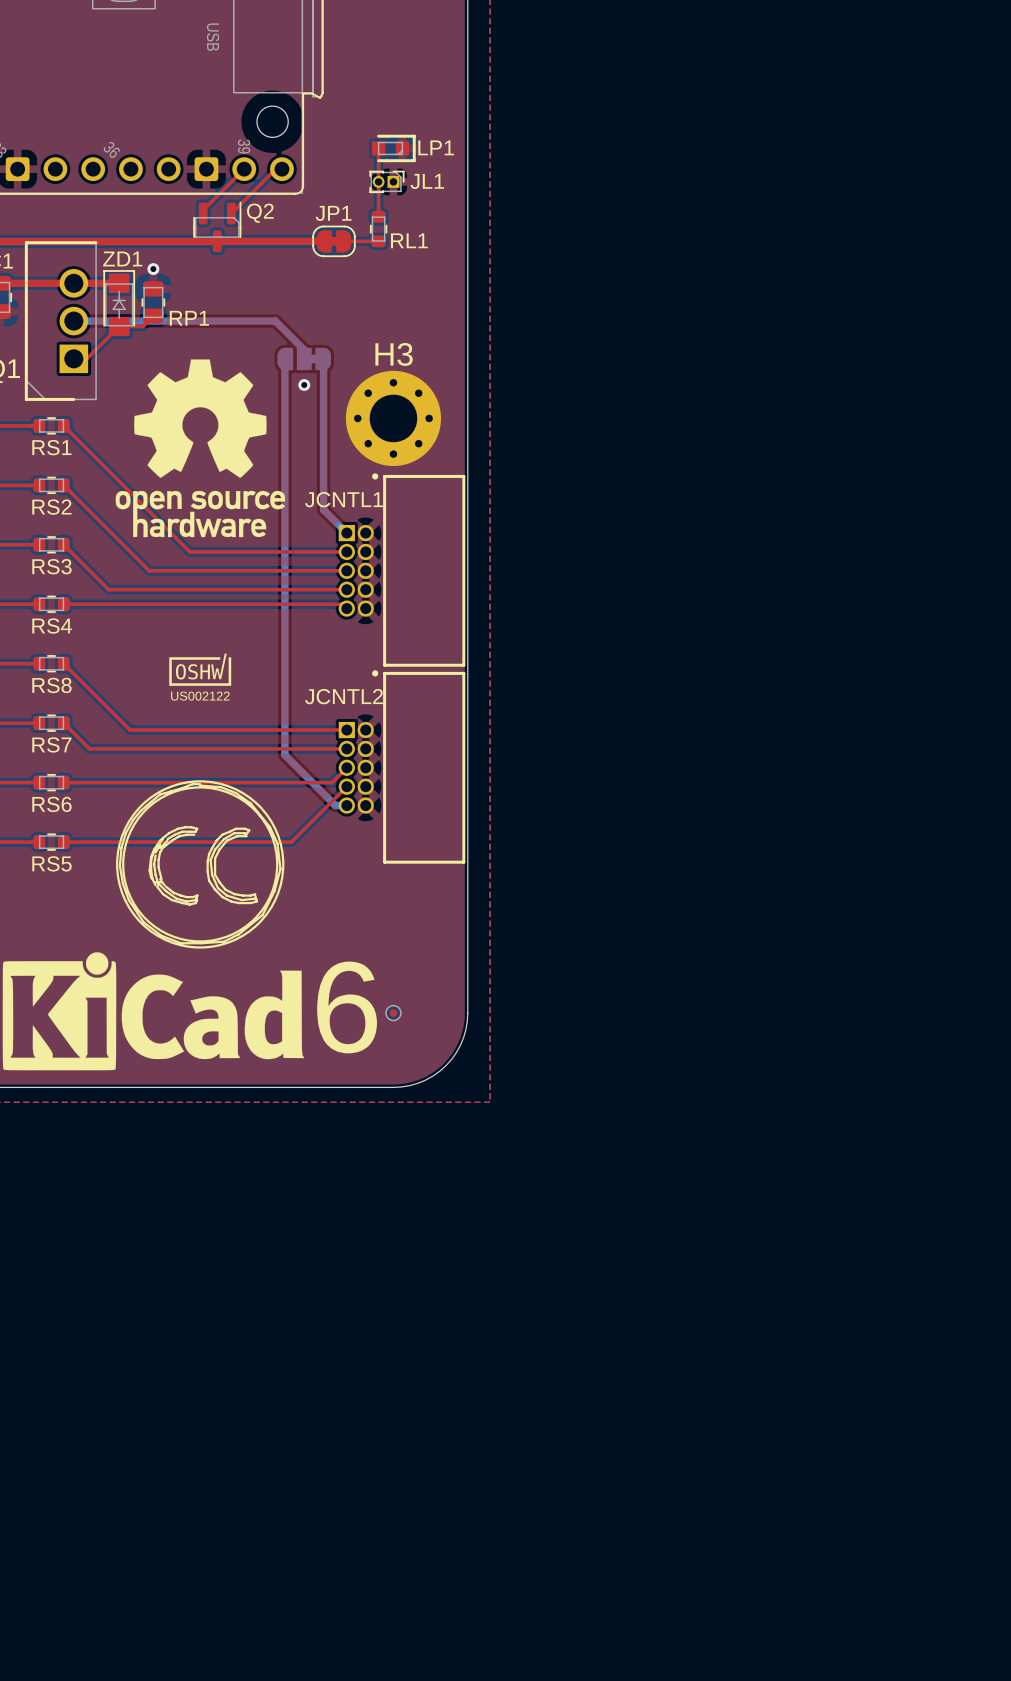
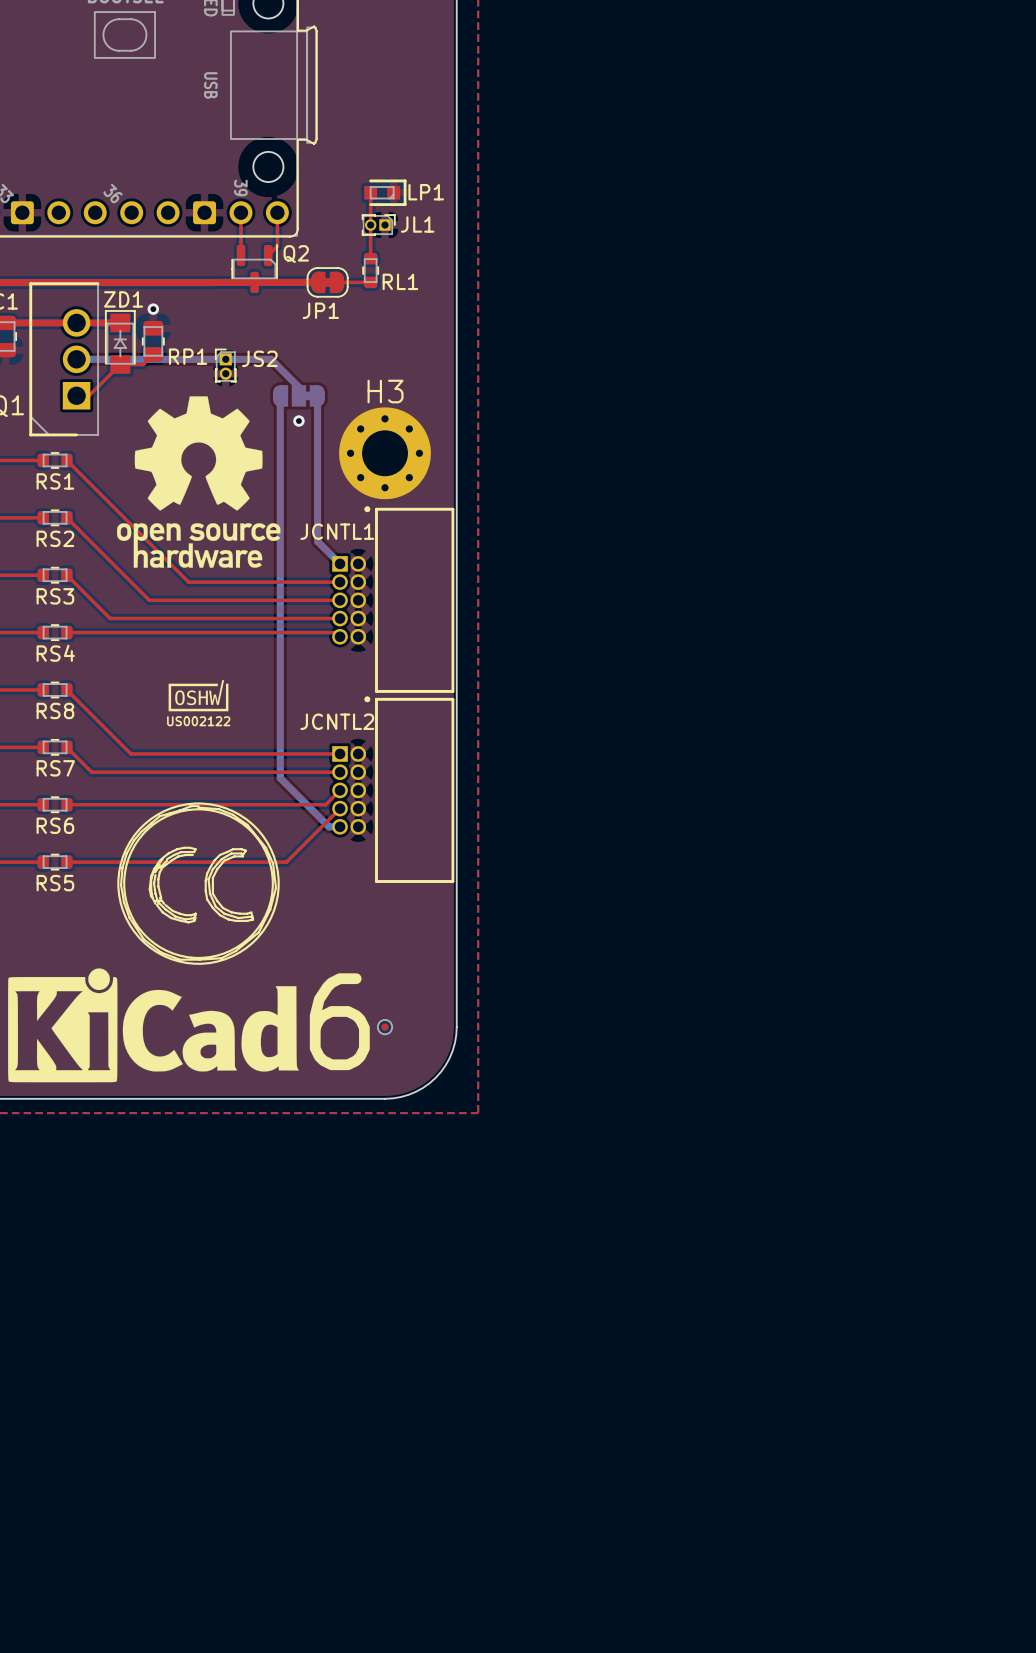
top track: (244, 169) (203, 210) -> (240, 212) (240, 255)
top track: (275, 169) (231, 213) -> none
top track: none -> (277, 212) (277, 246) (268, 255)
JP1 name position: JP1 (333, 213) -> JP1 (320, 310)
Q2 position: (217, 226) -> (254, 268)
JS2: none -> (225, 365)

